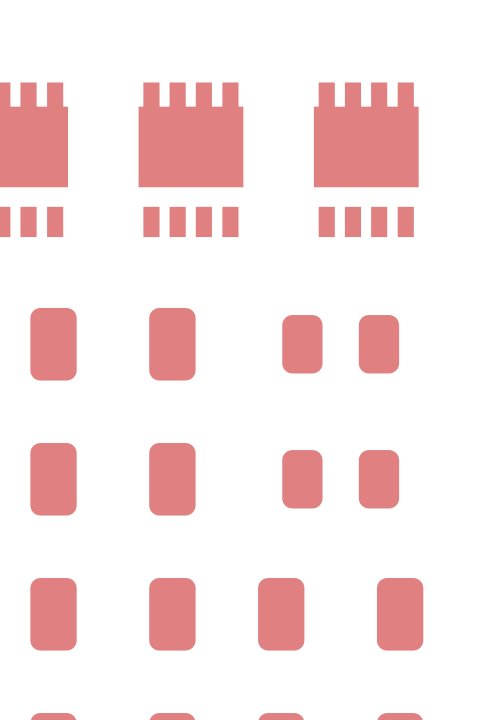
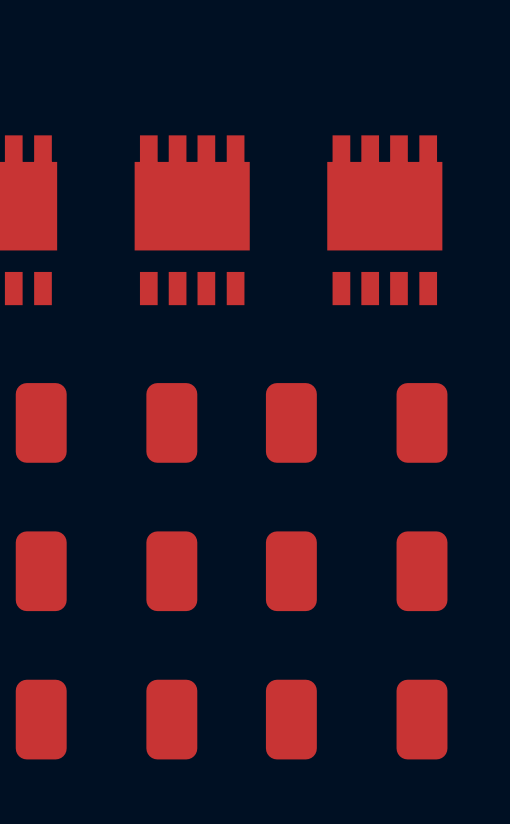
part footprint: [282, 315, 400, 374] -> [265, 383, 448, 463]
part footprint: [282, 450, 400, 509] -> [265, 531, 448, 612]

